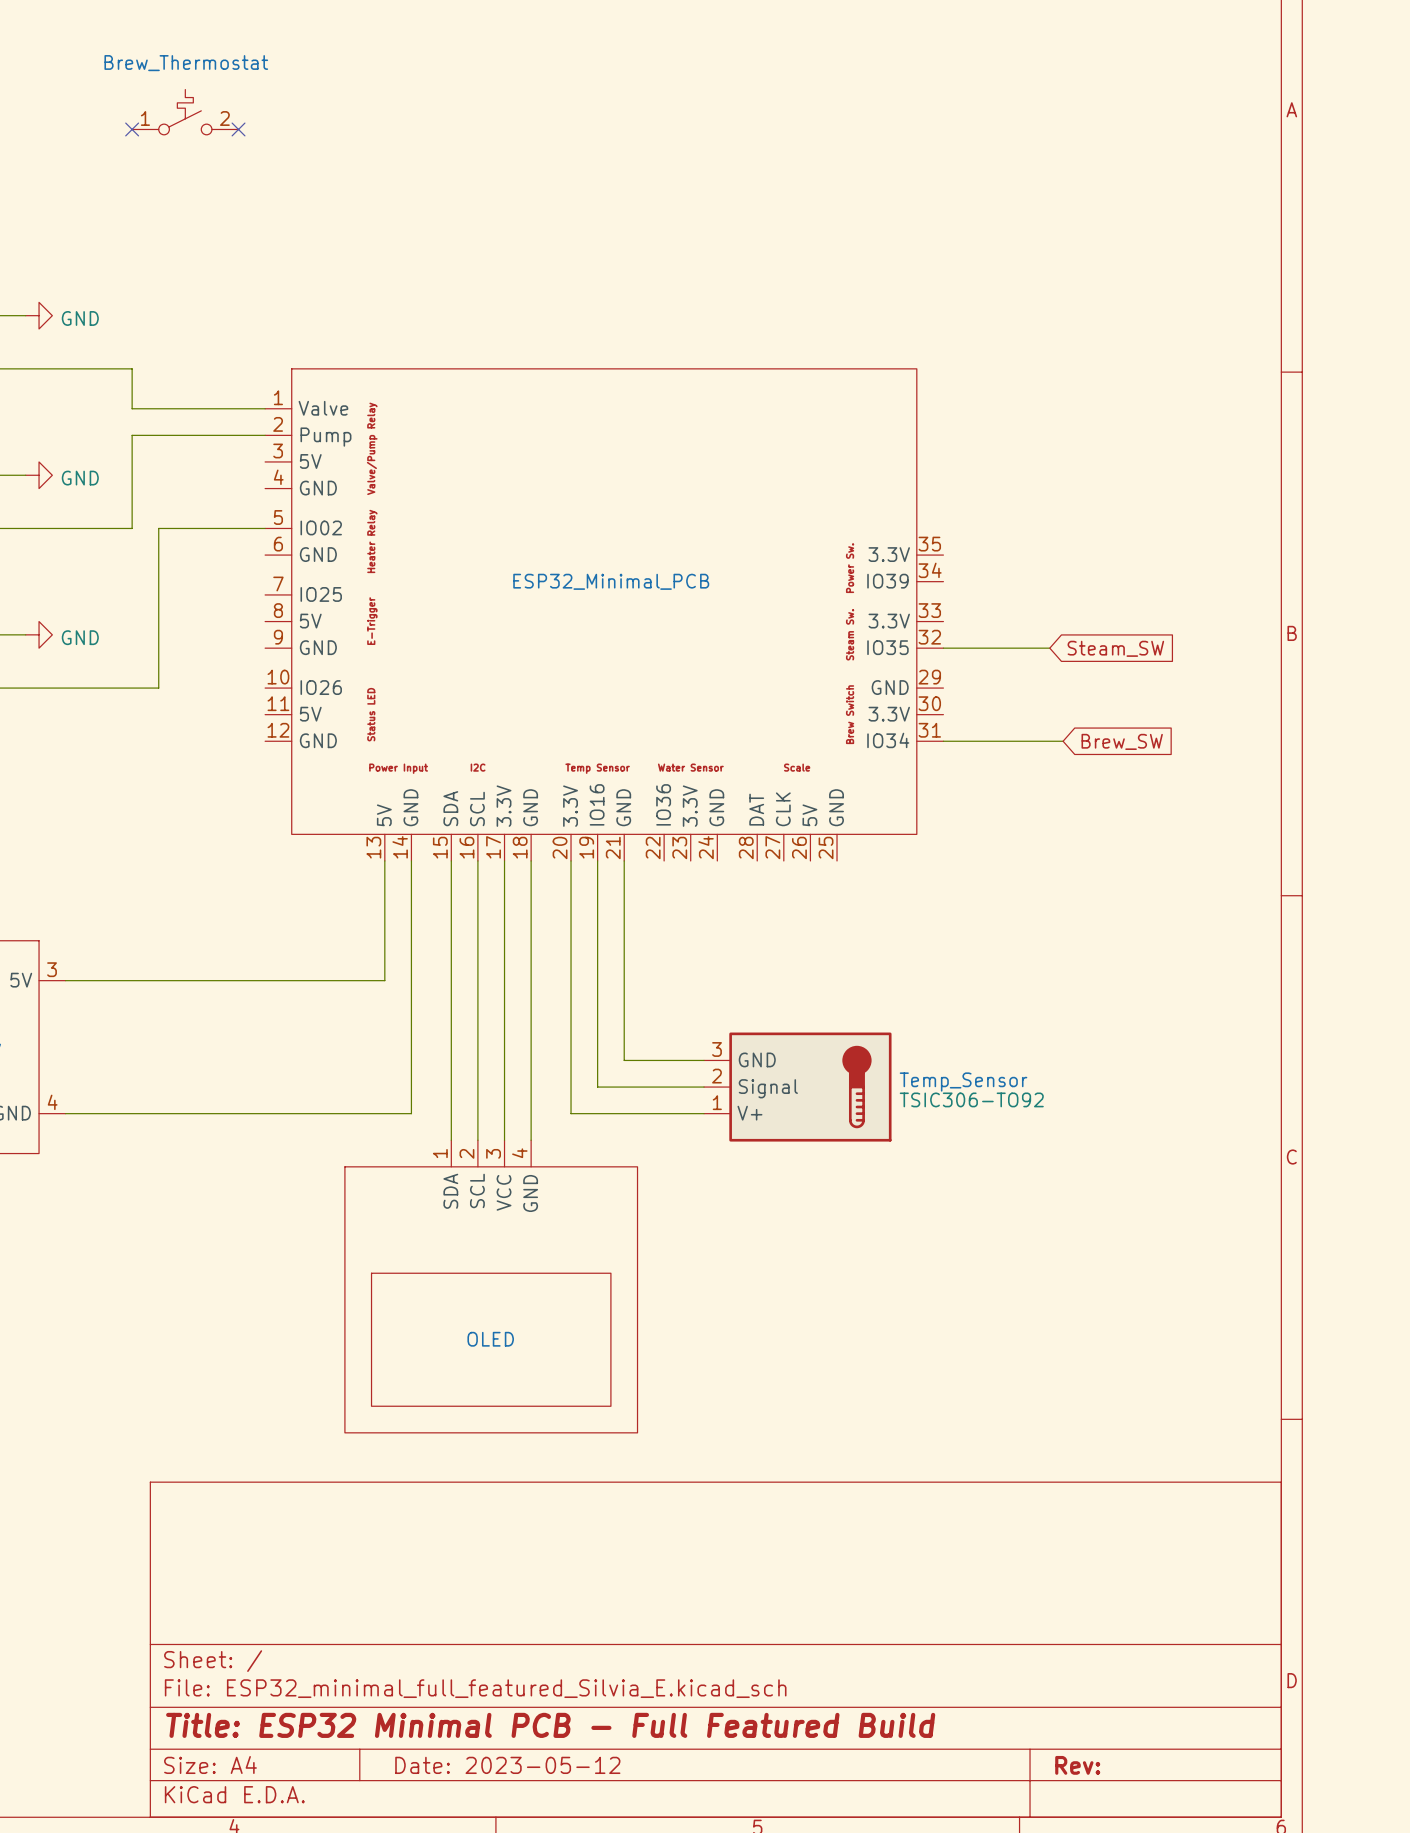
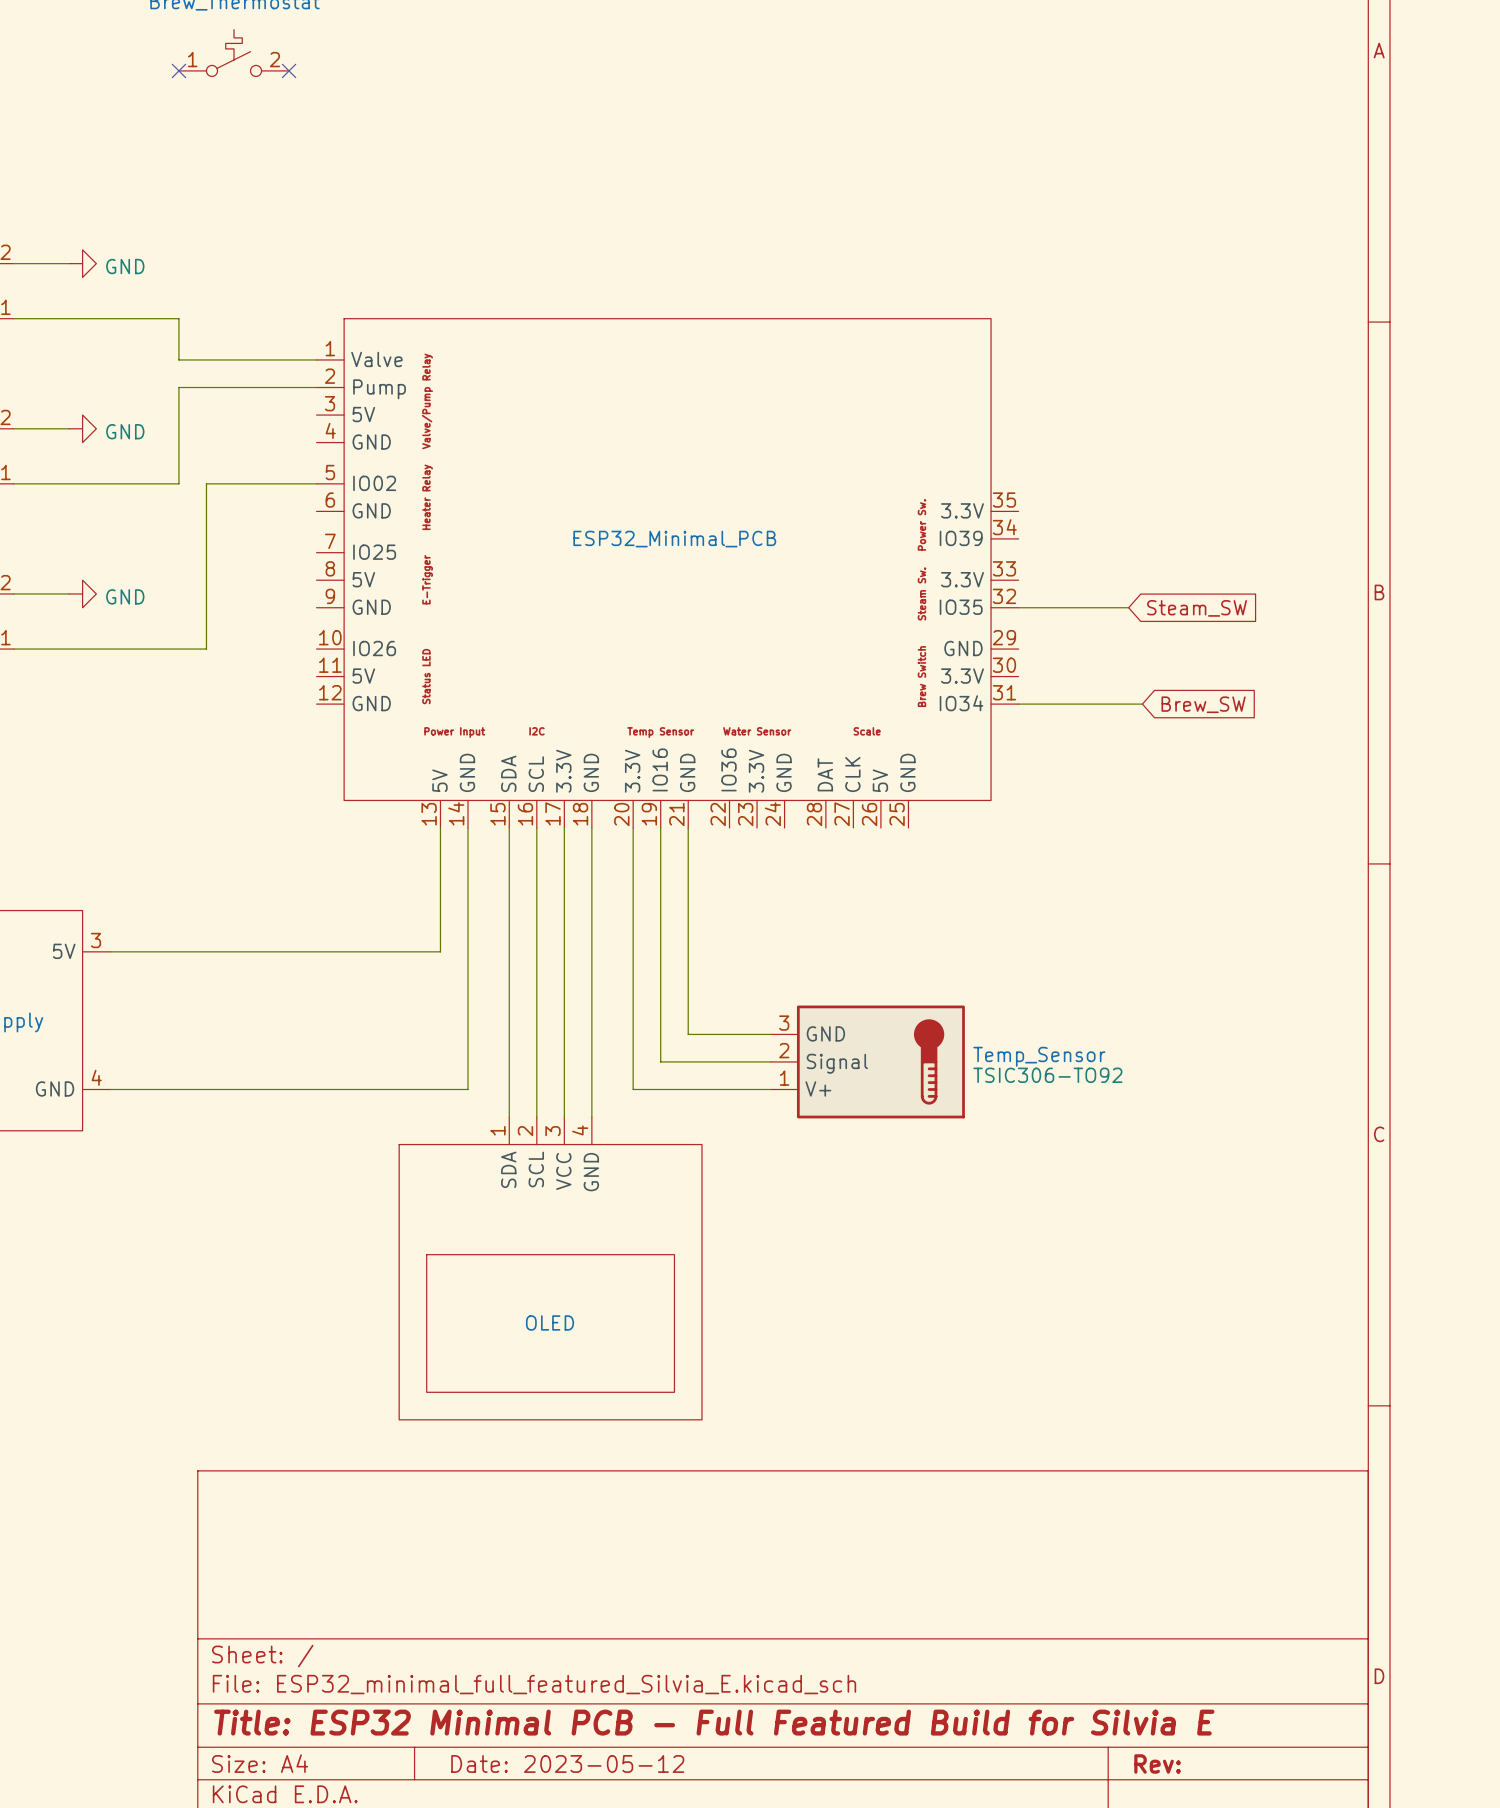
title block: Title: ESP32 Minimal PCB - Full Featured Build (550, 1725) -> Title: ESP32 Minimal PCB - Full Featured Build for Silvia E (714, 1722)

